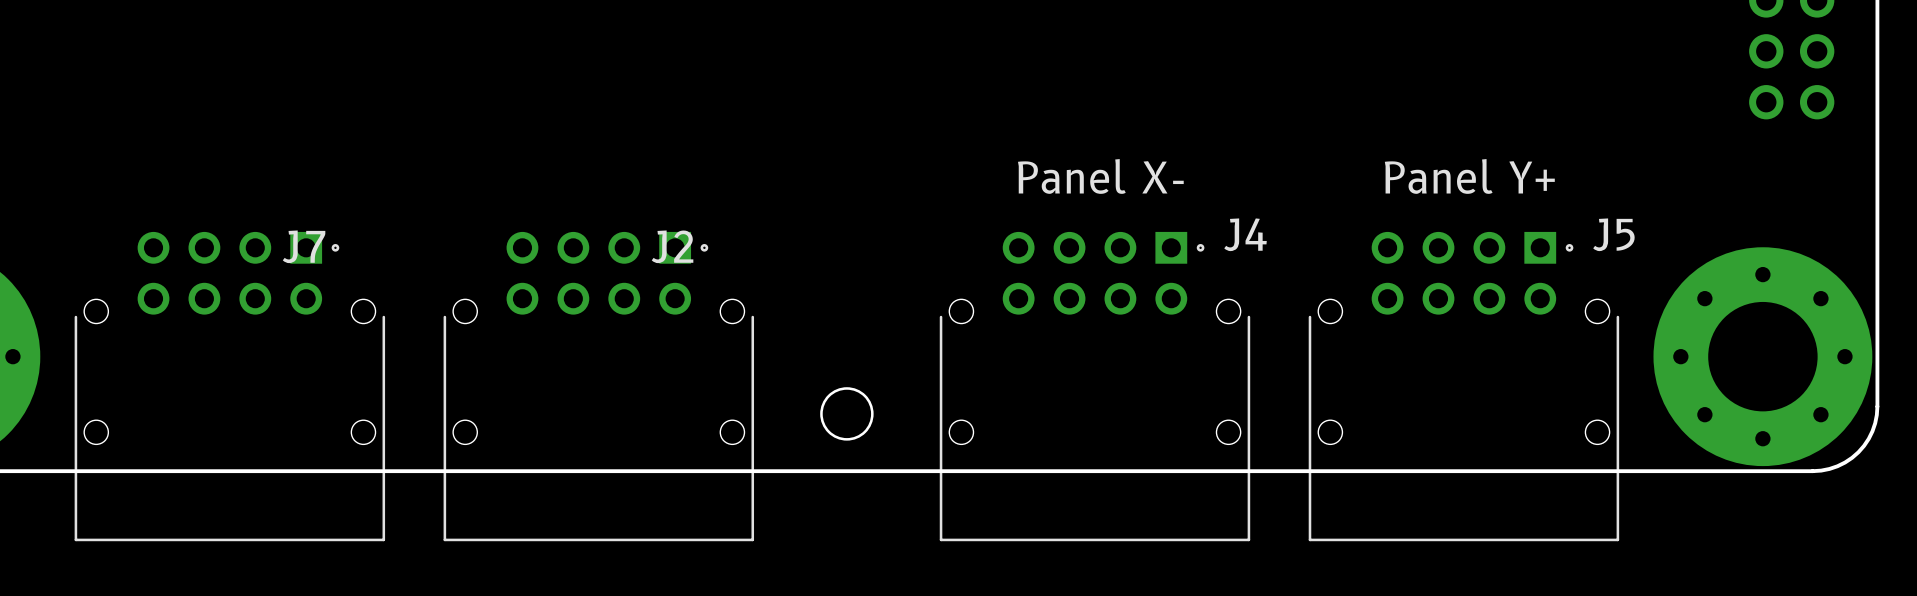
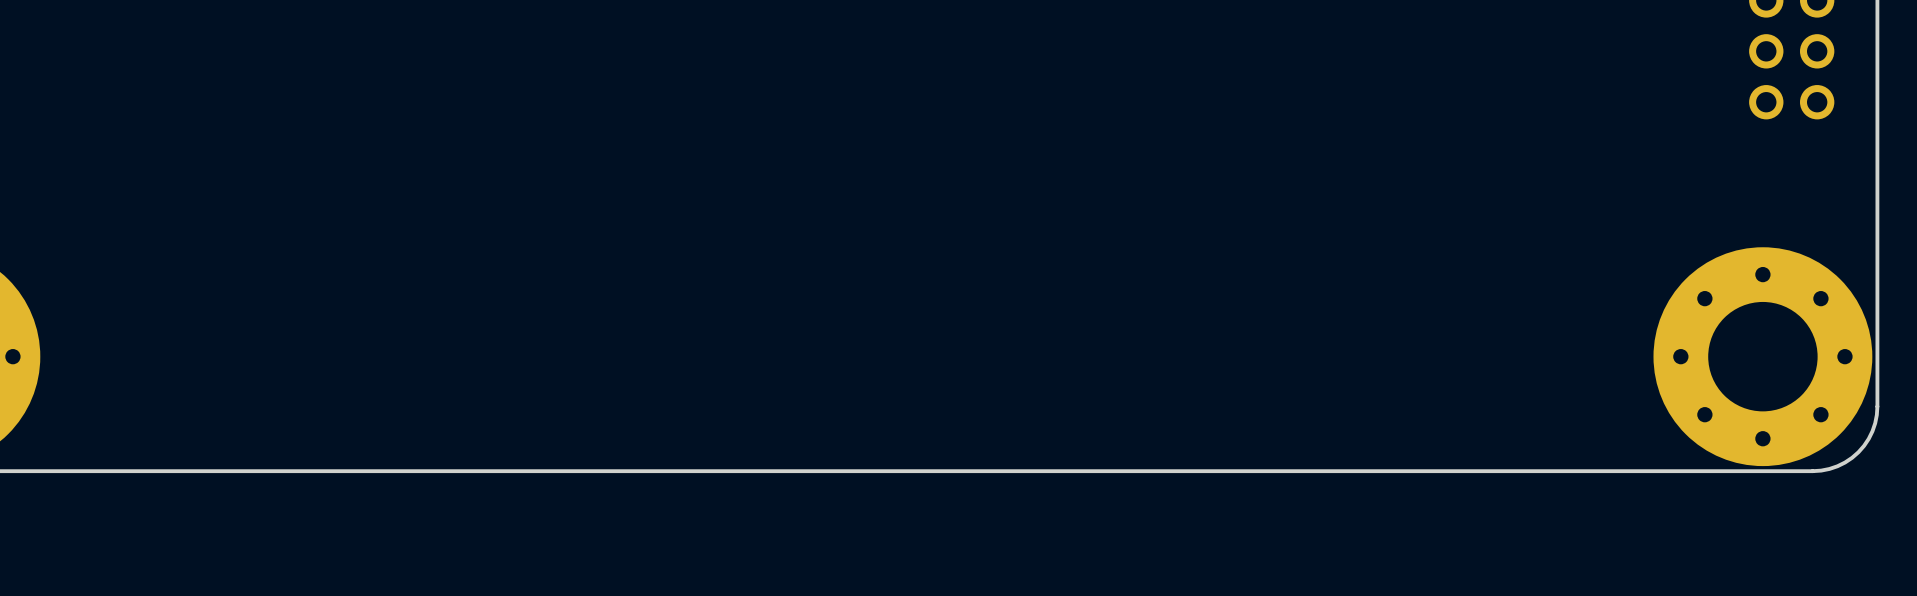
J7: (229, 386) -> none
J2: (598, 386) -> none
J4: Panel X- (1094, 386) -> none
J5: Panel Y+ (1463, 386) -> none
round board edge: [820, 387, 874, 441] -> none

